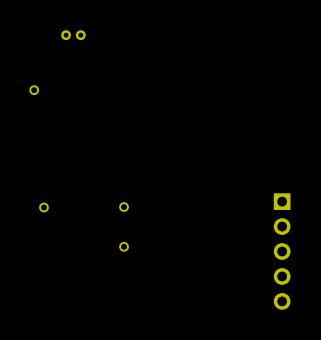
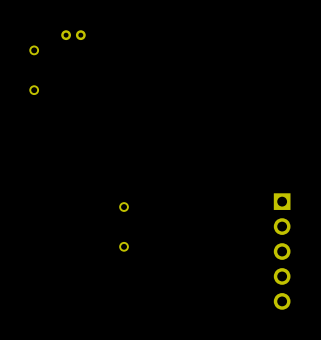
part position: (44, 207) -> (34, 50)

